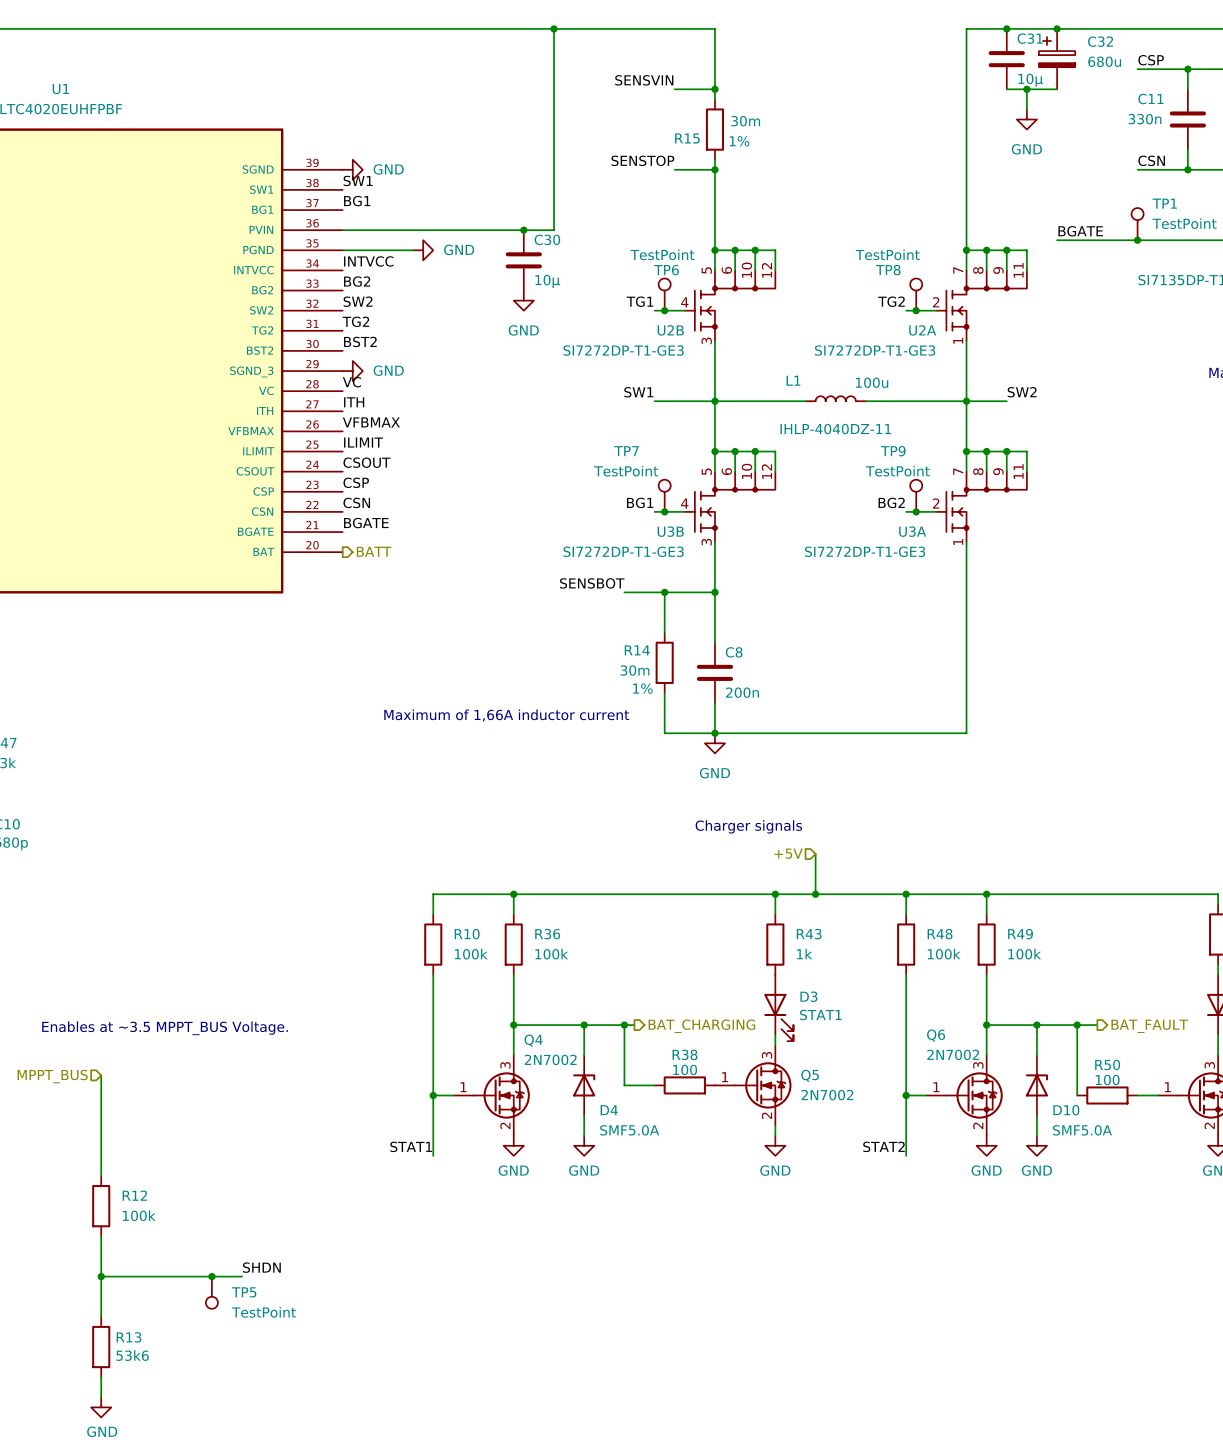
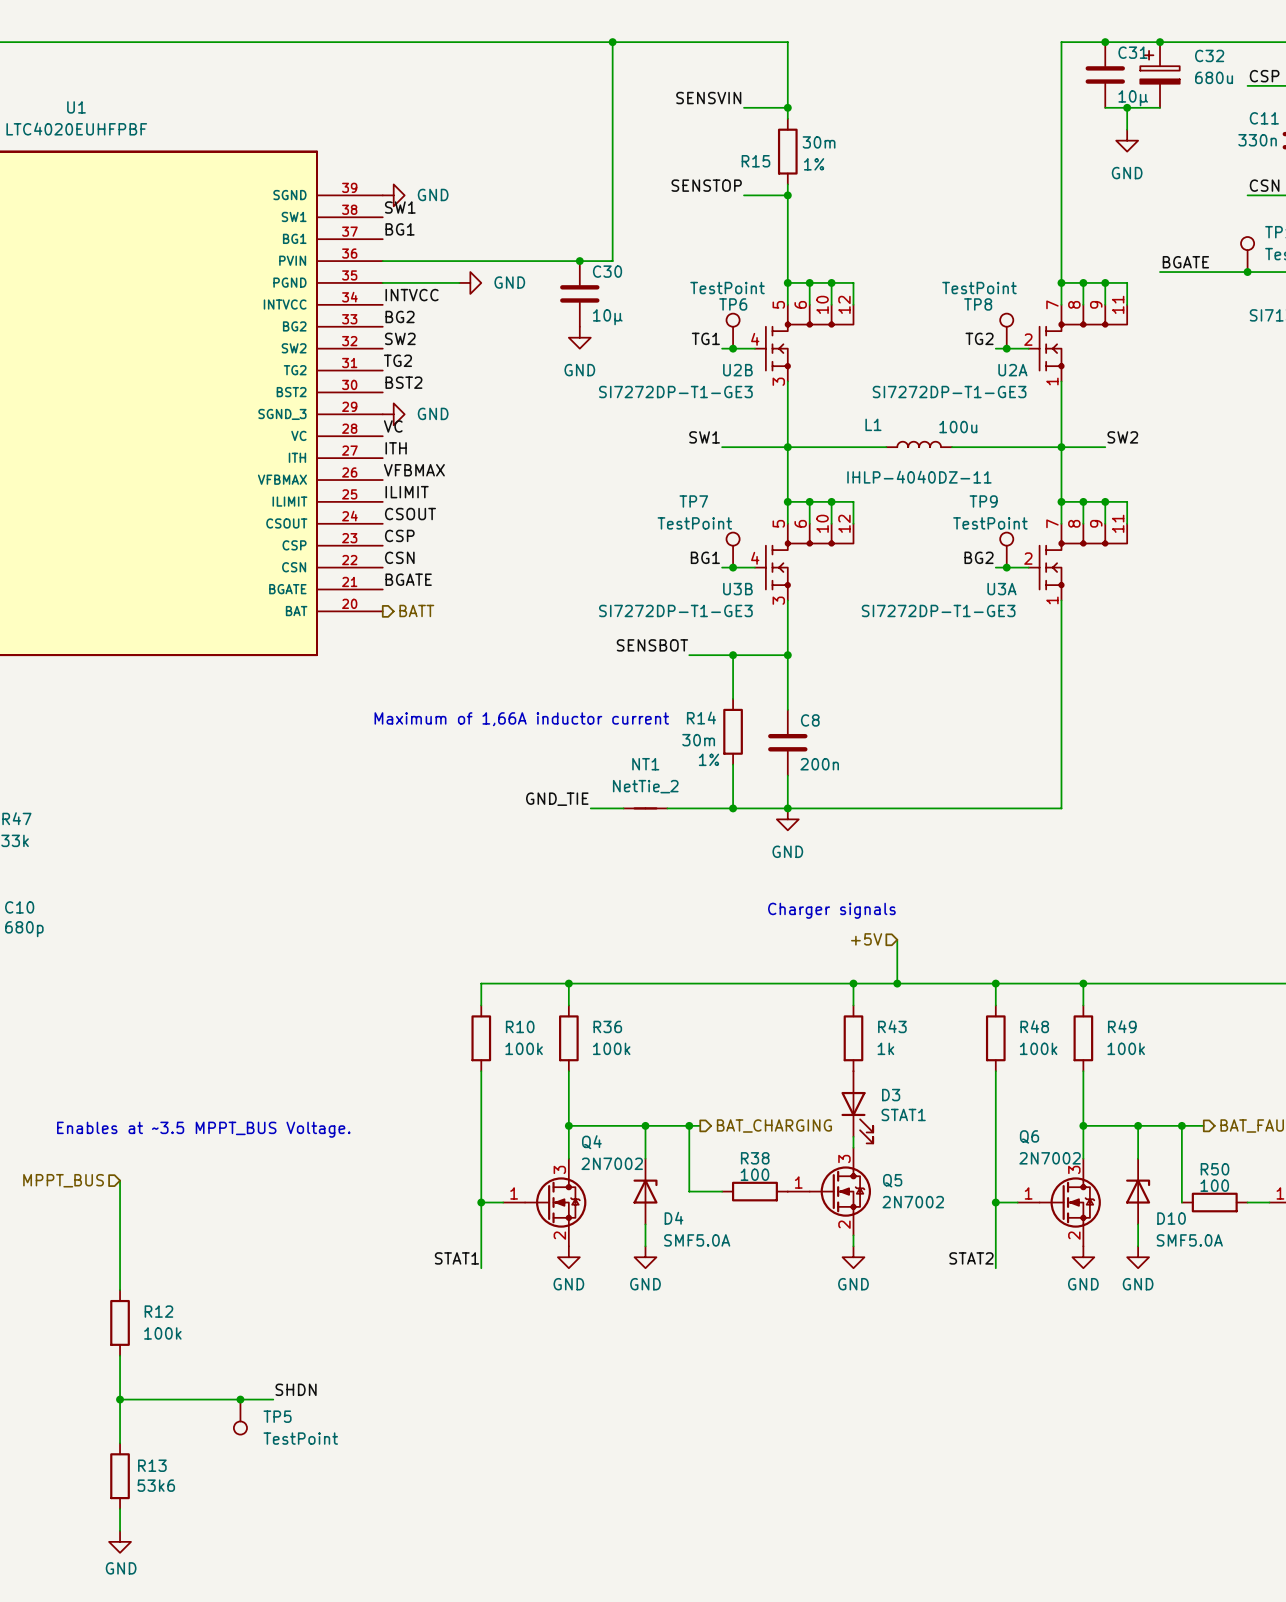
text position: Maximum of 1,66A inductor current (506, 715) -> Maximum of 1,66A inductor current (521, 719)
label: none -> GND_TIE (557, 799)
wire: none -> (590, 808) (623, 808)
NT1: none -> NetTie_2 (645, 808)
wire: none -> (667, 808) (733, 808)
junction: none -> (733, 808)

